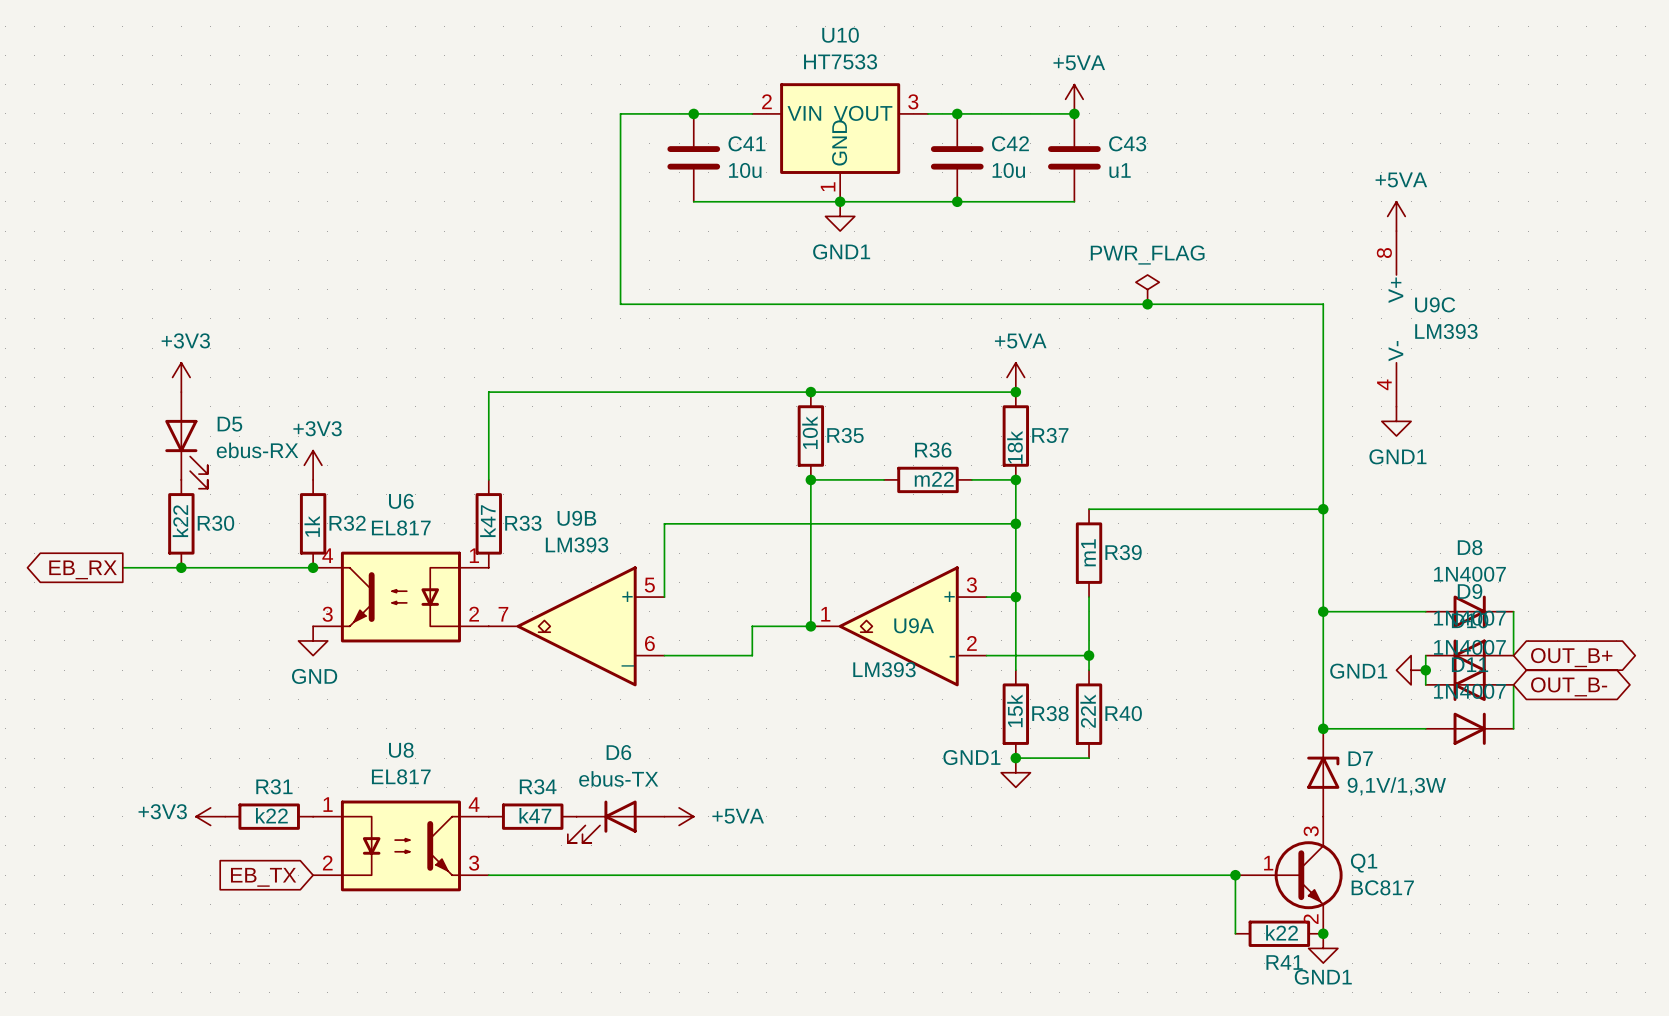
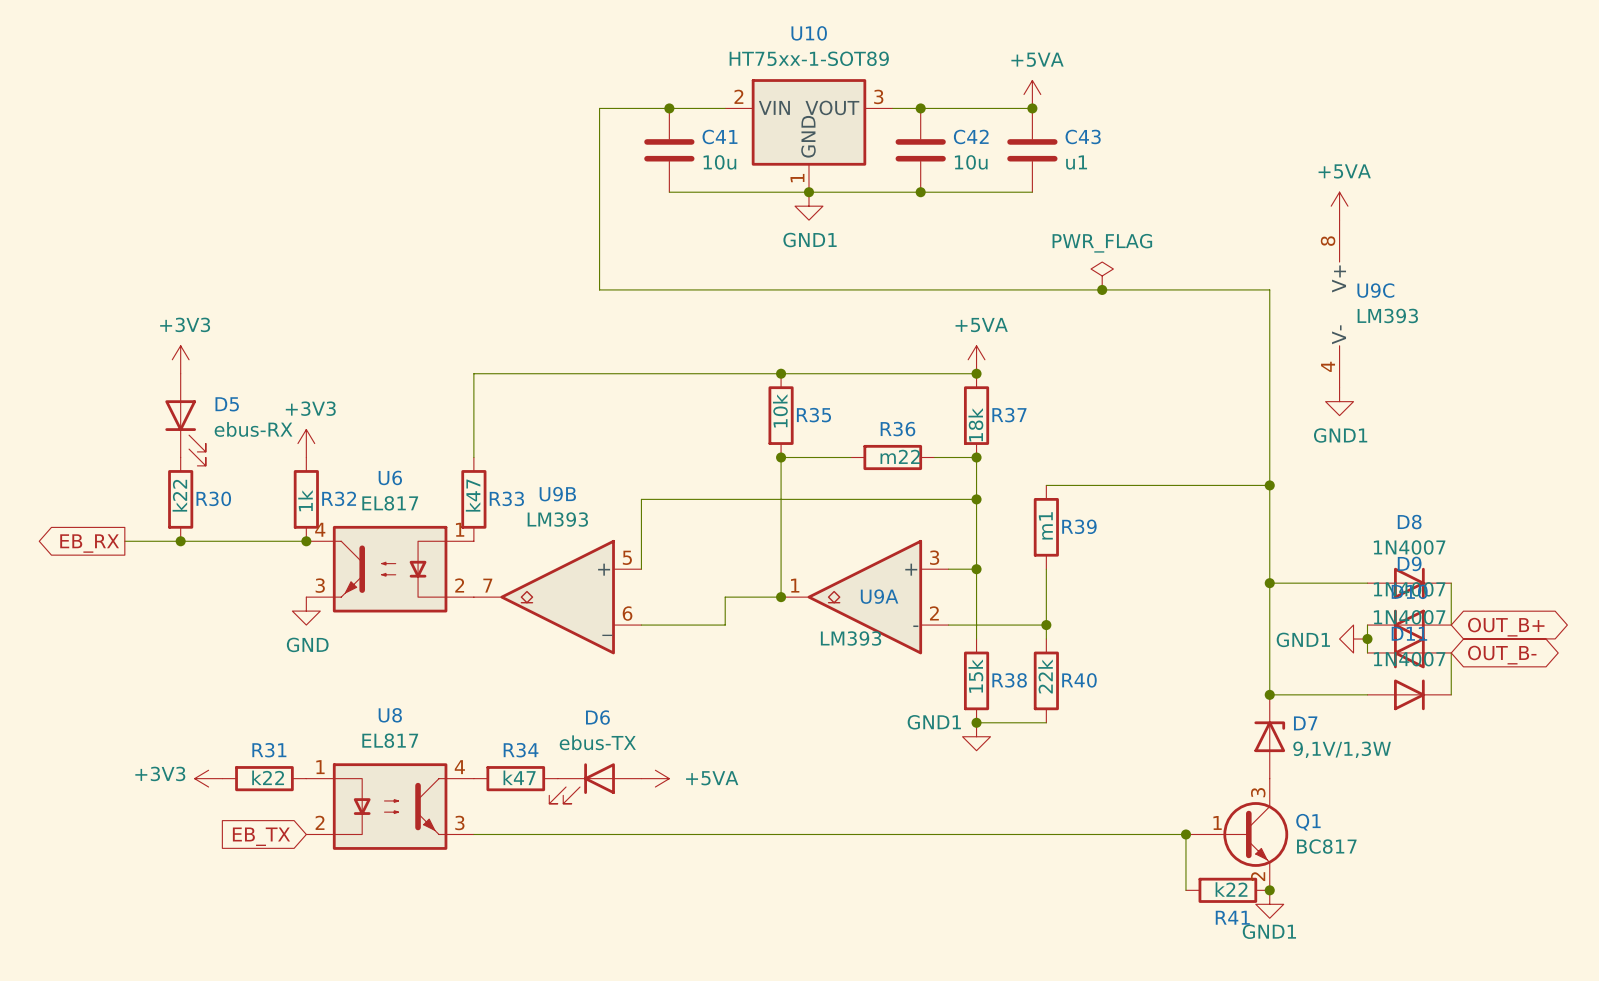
U10 value: HT7533 (840, 61) -> HT75xx-1-SOT89 (809, 58)

